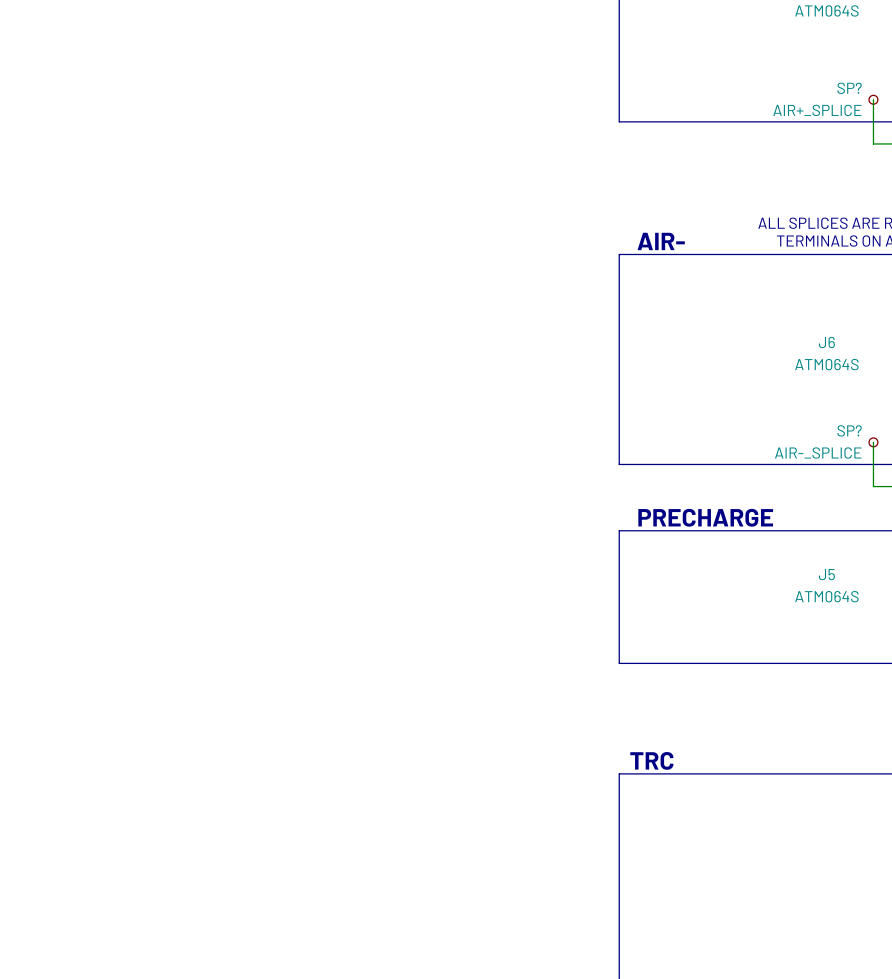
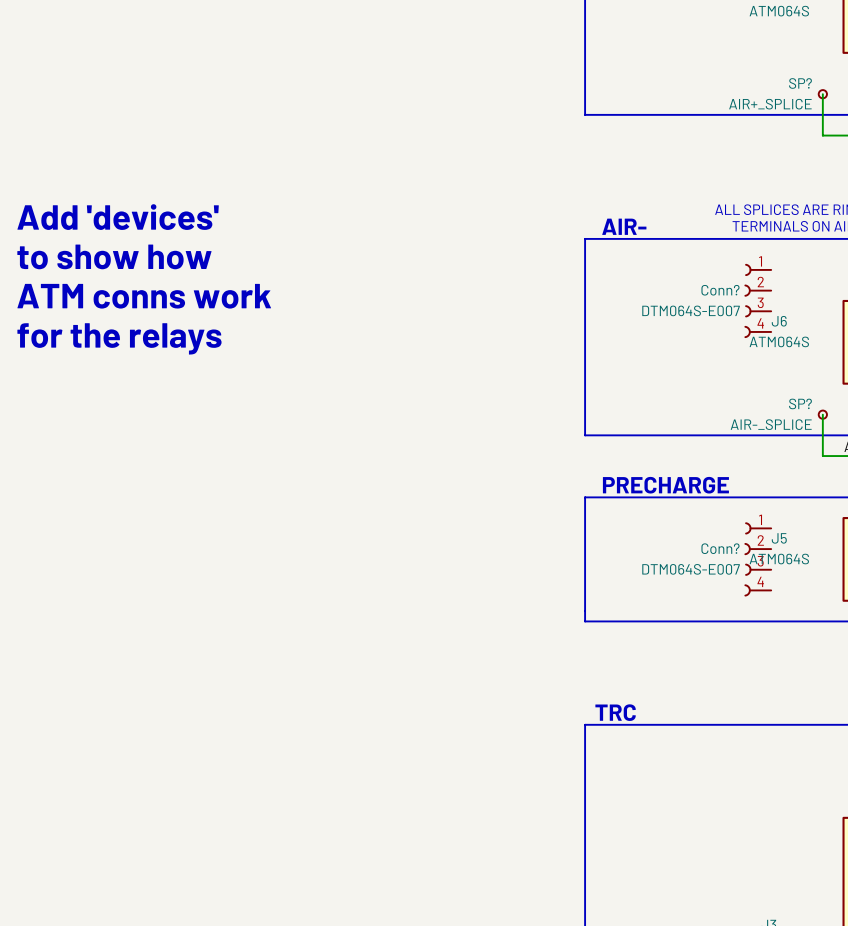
text: none -> Add 'devices' (118, 217)
text: none -> to show how (114, 256)
text: none -> ATM conns work (144, 296)
Conn?: none -> (758, 300)
text: none -> for the relays (119, 338)
Conn?: none -> (758, 559)

